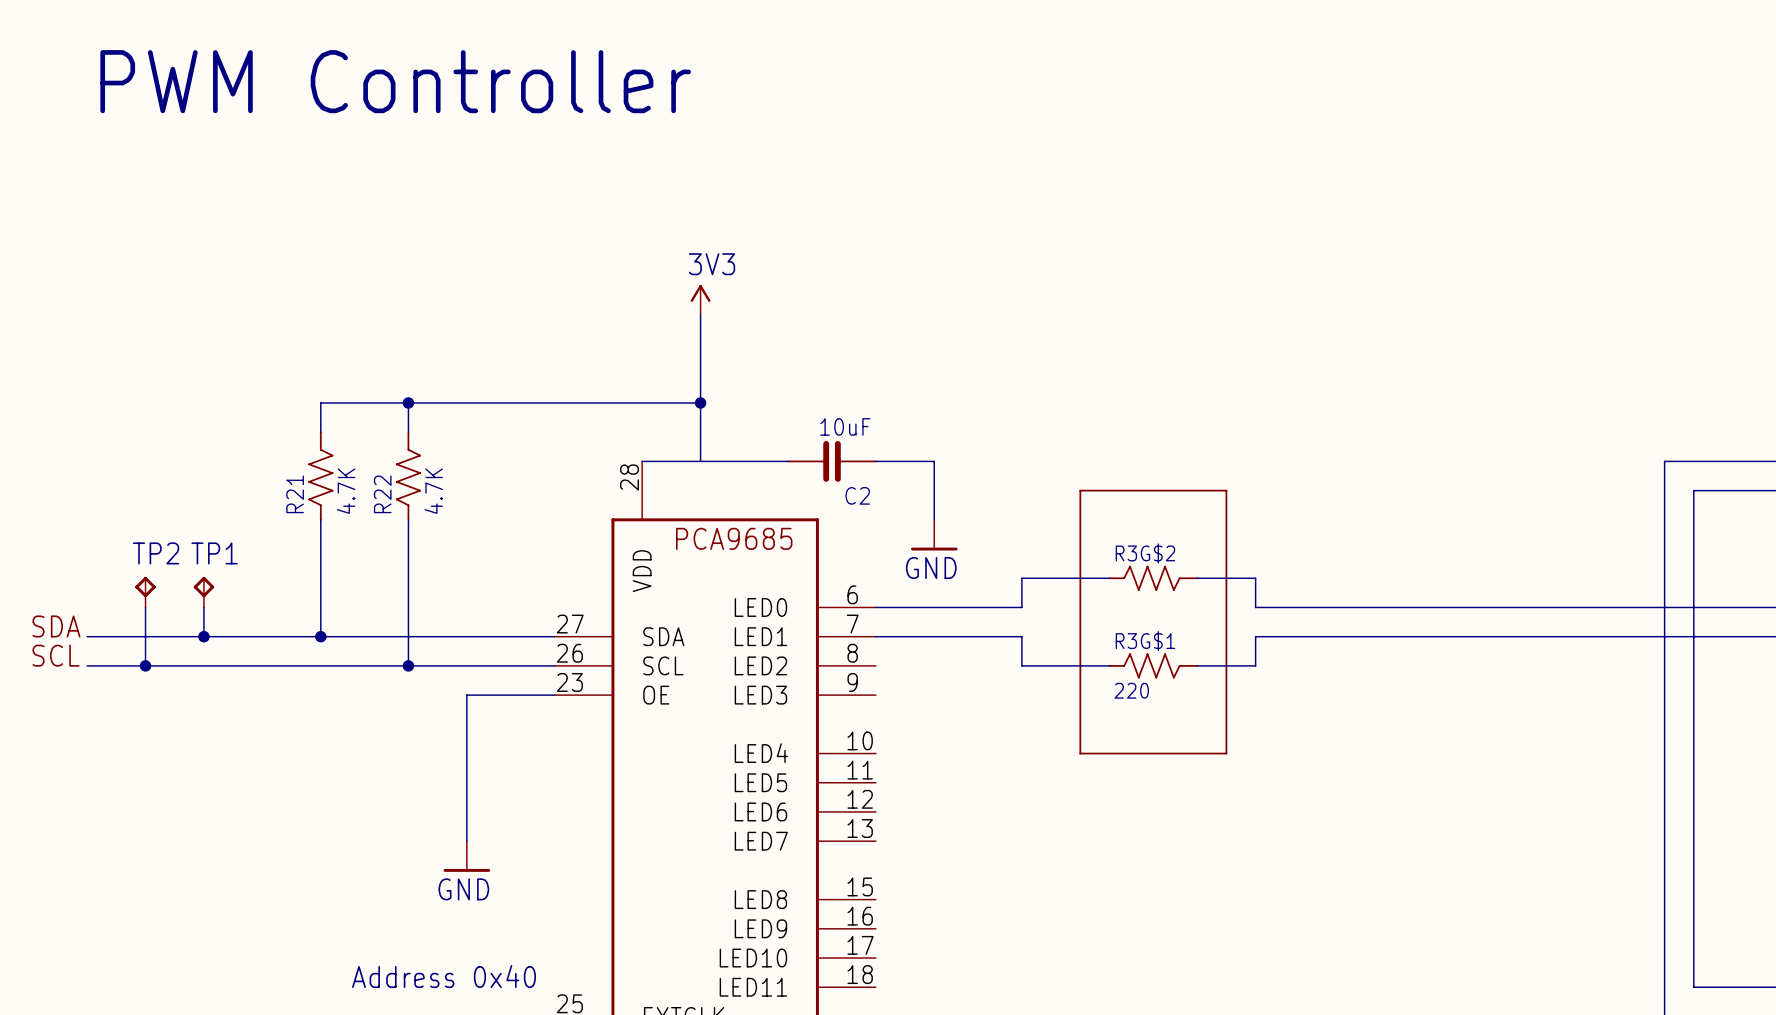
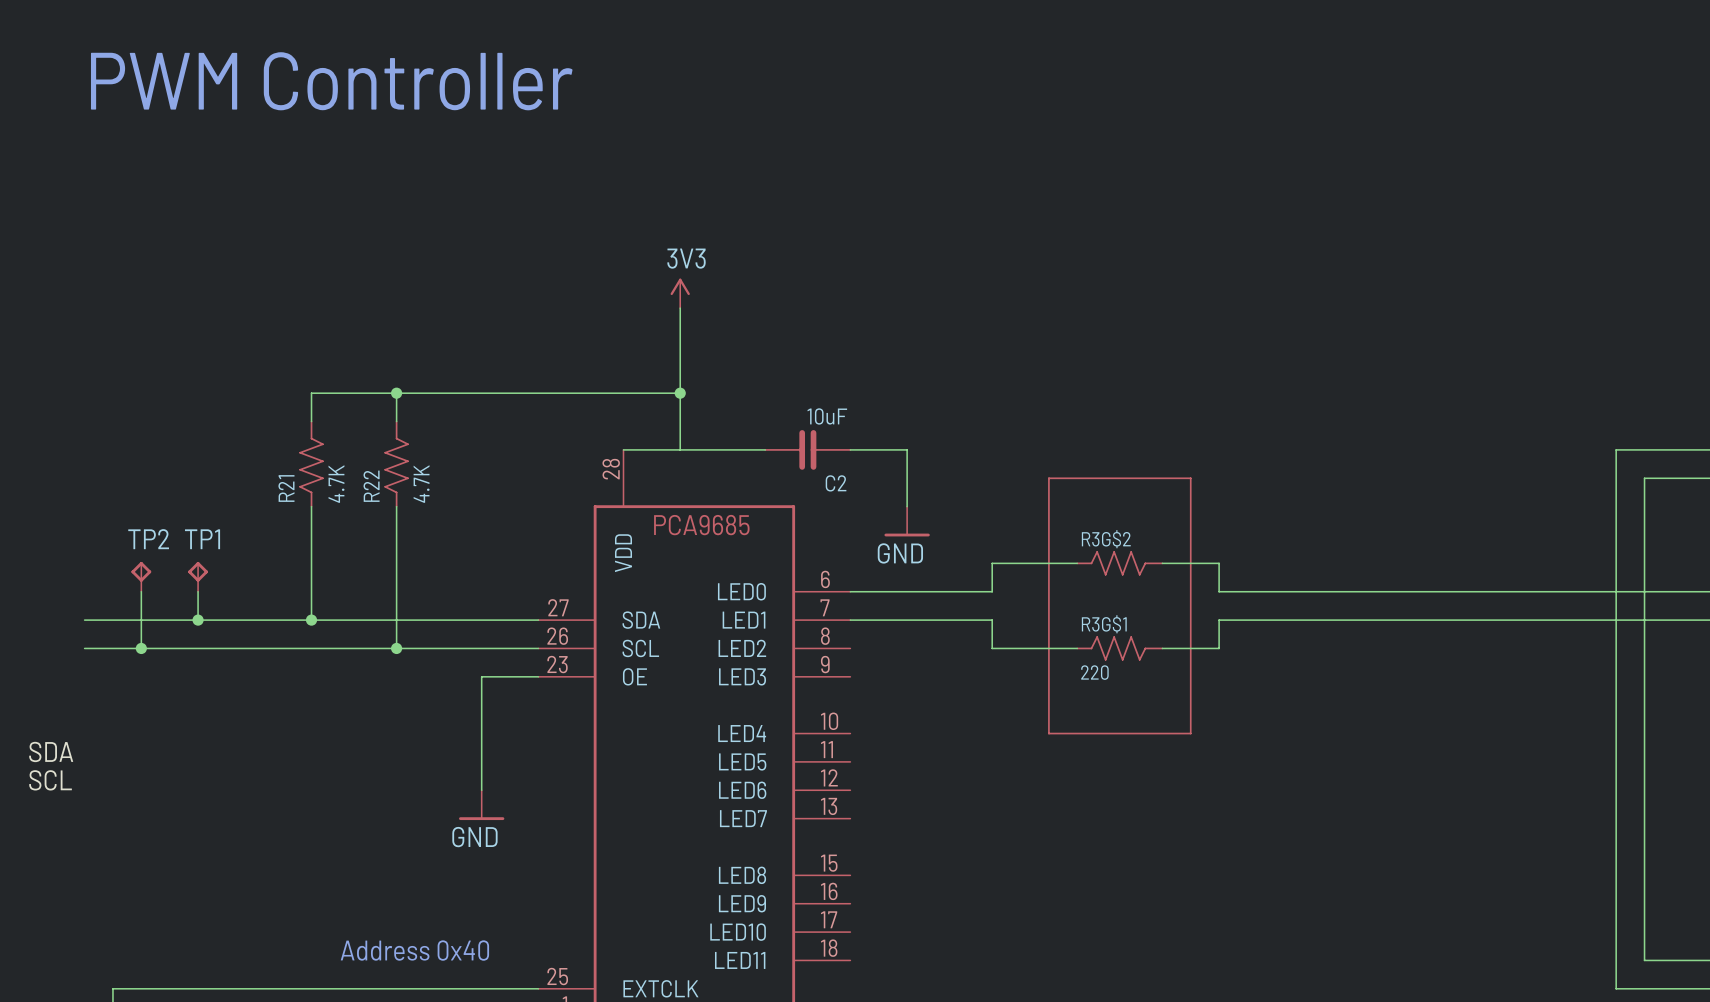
label position: SDA (56, 626) -> SDA (51, 751)
label position: SCL (56, 655) -> SCL (50, 780)
wire: (496, 695) (466, 695) (466, 841) -> (481, 676) (481, 790)
power symbol position: GND (466, 856) -> GND (481, 805)

